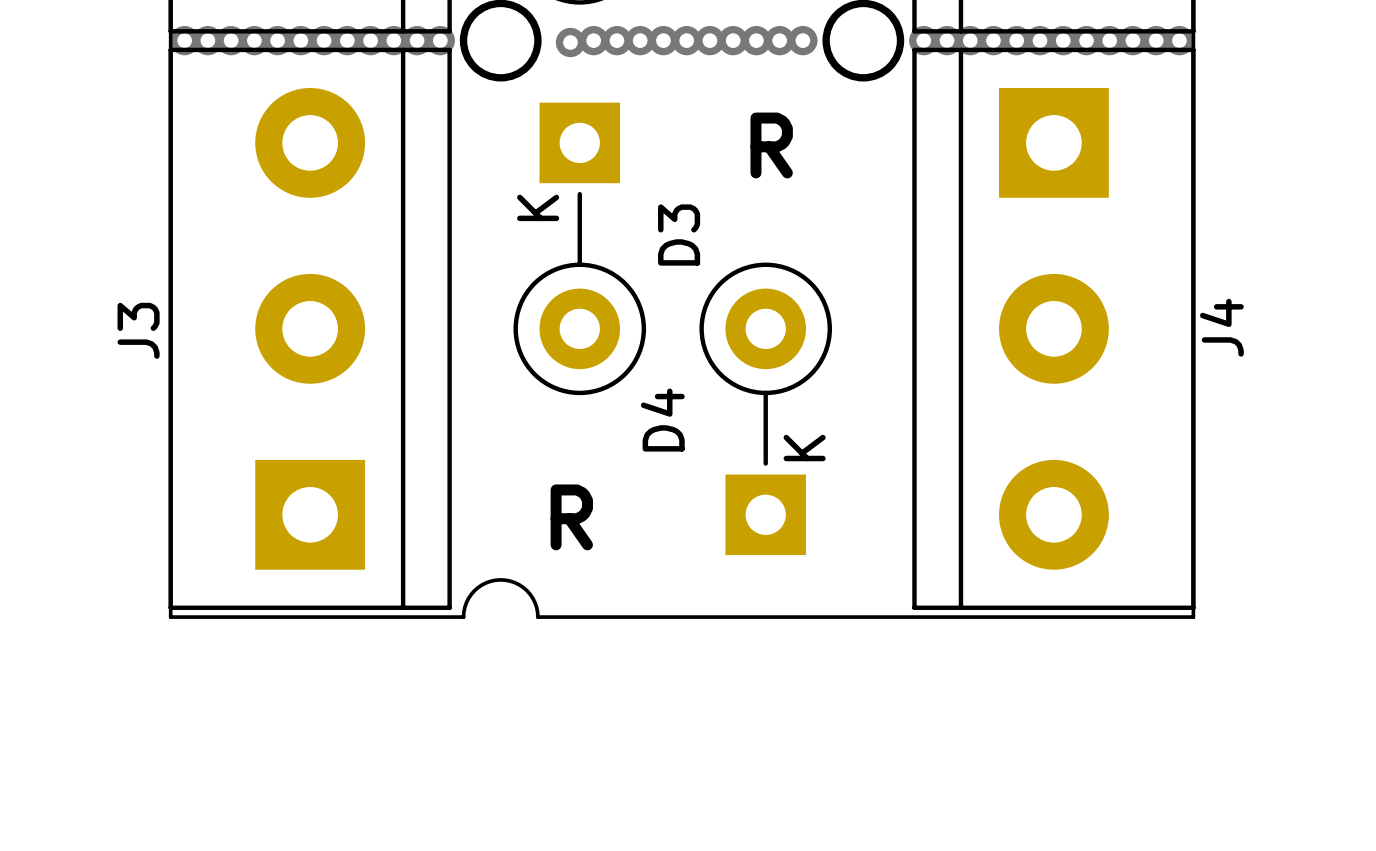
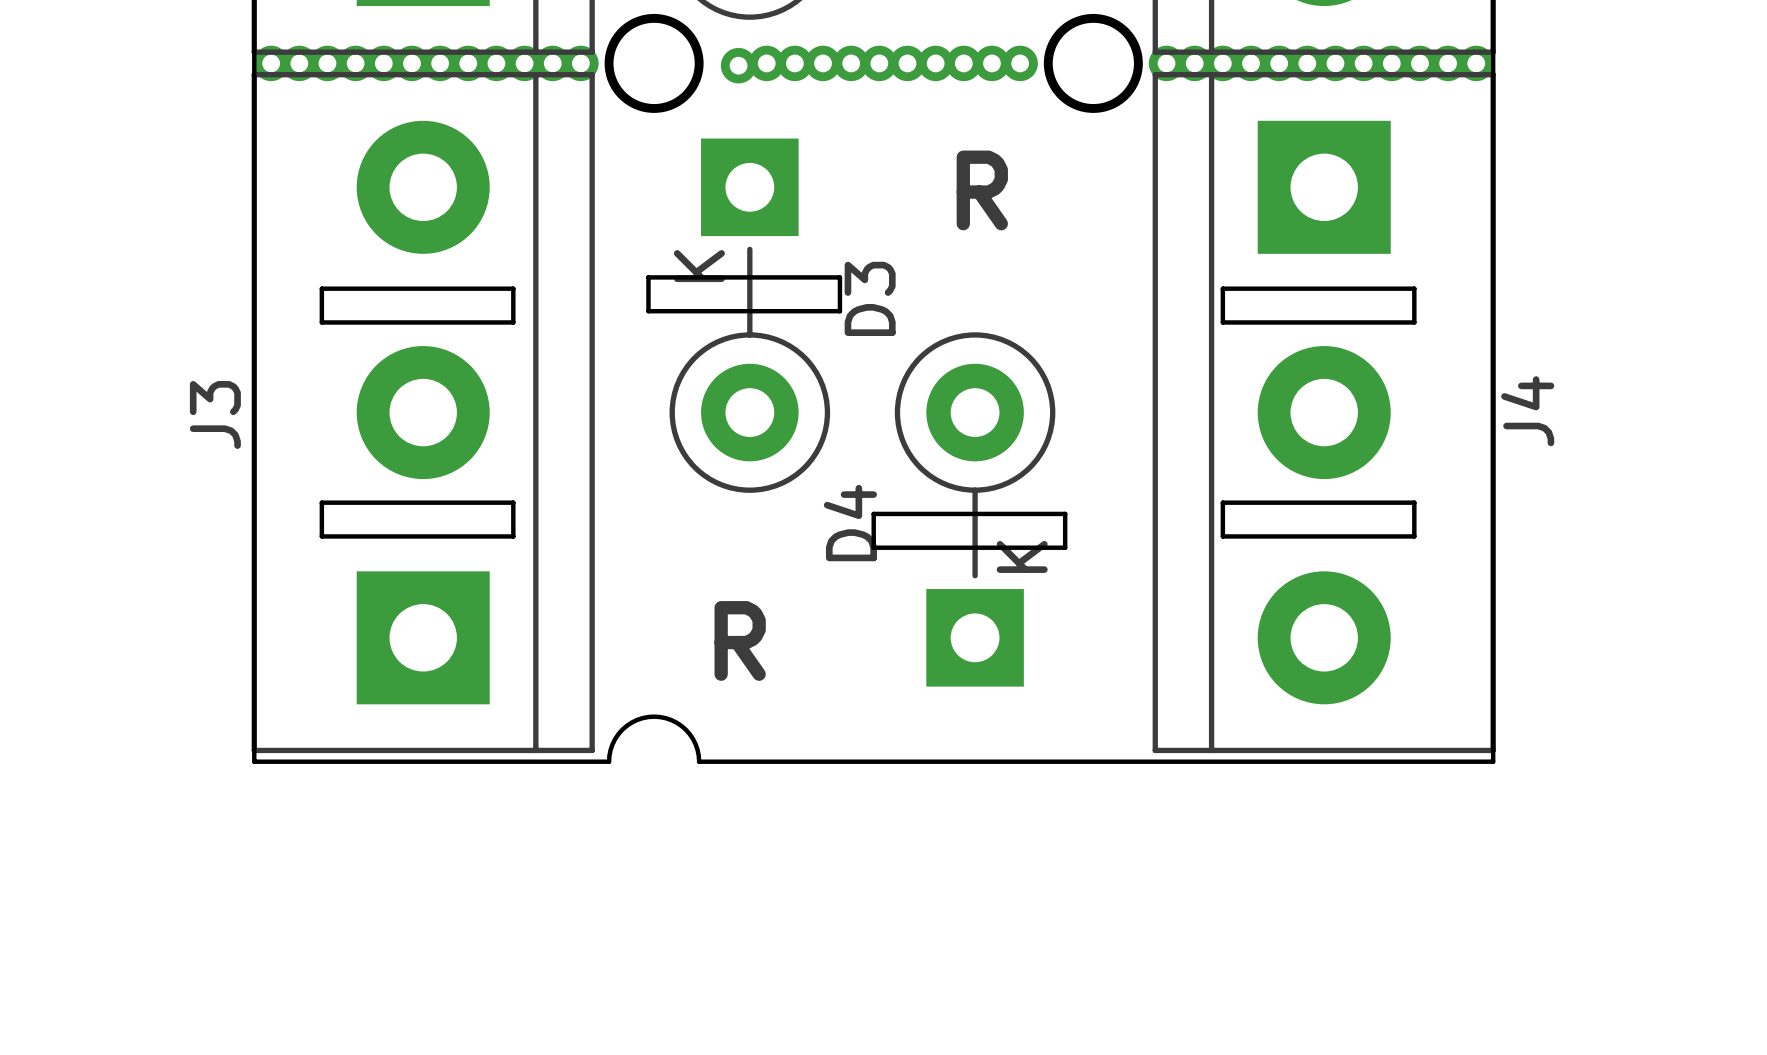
board edge: none -> (648, 277) (839, 277) (839, 311) (648, 311) (648, 277)
board edge: none -> (321, 288) (321, 322) (513, 322) (513, 288) (321, 288)
board edge: none -> (1222, 288) (1222, 322) (1414, 322) (1414, 288) (1222, 288)
board edge: none -> (321, 502) (513, 502) (513, 536) (321, 536) (321, 502)
board edge: none -> (1222, 502) (1414, 502) (1414, 536) (1222, 536) (1222, 502)
board edge: none -> (873, 513) (1065, 513) (1065, 547) (873, 547) (873, 513)

